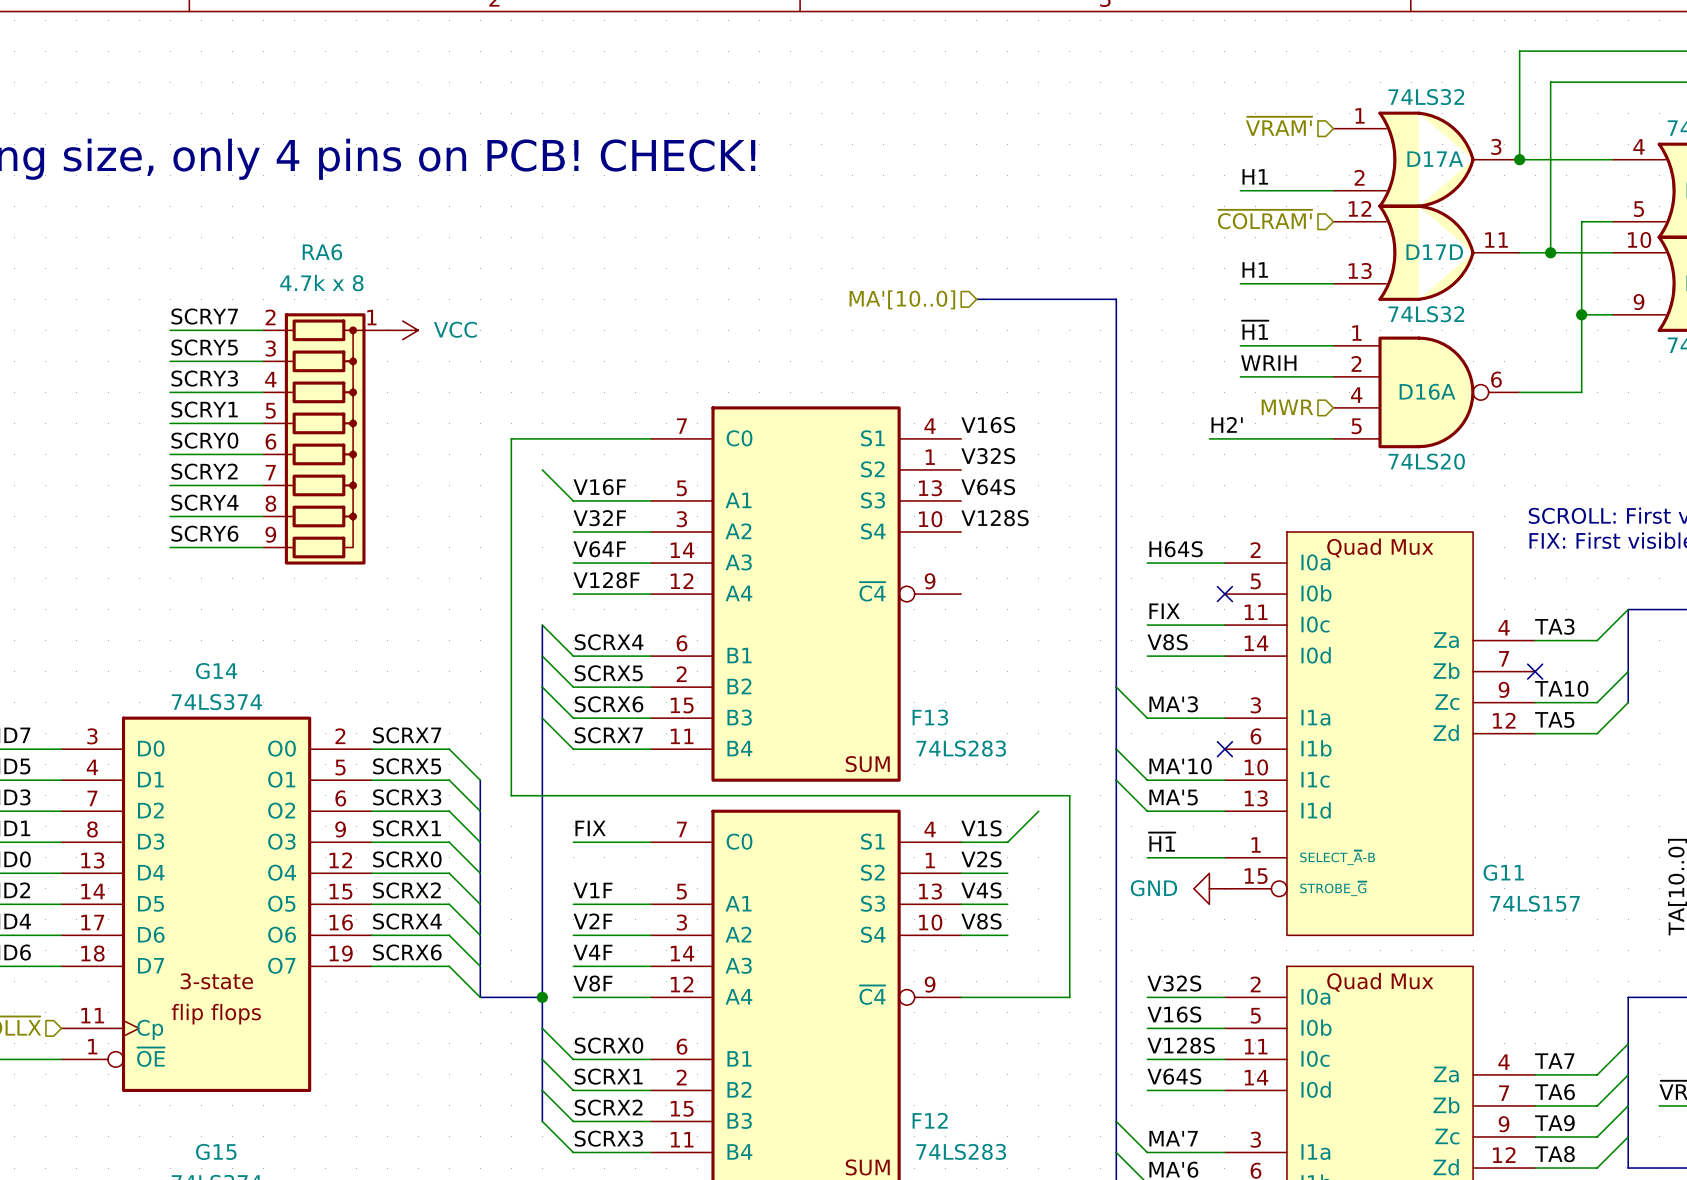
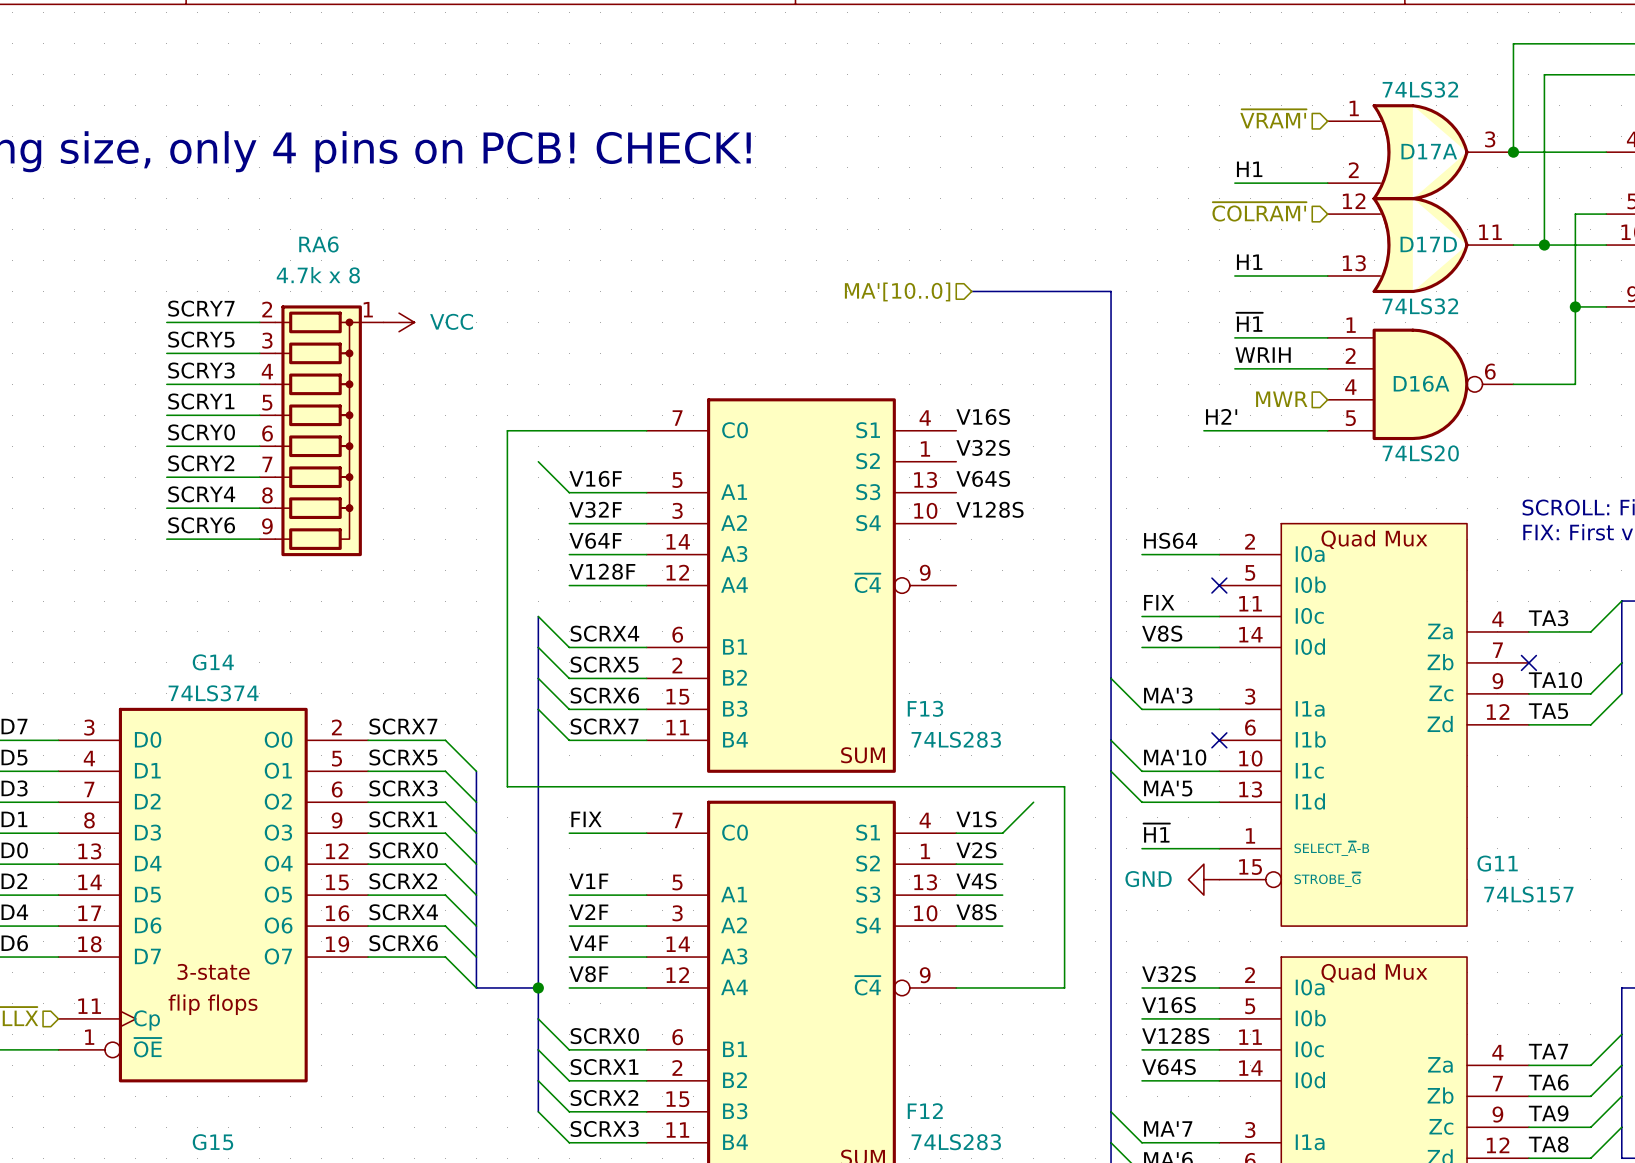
label: H64S (1176, 549) -> HS64 (1170, 540)

